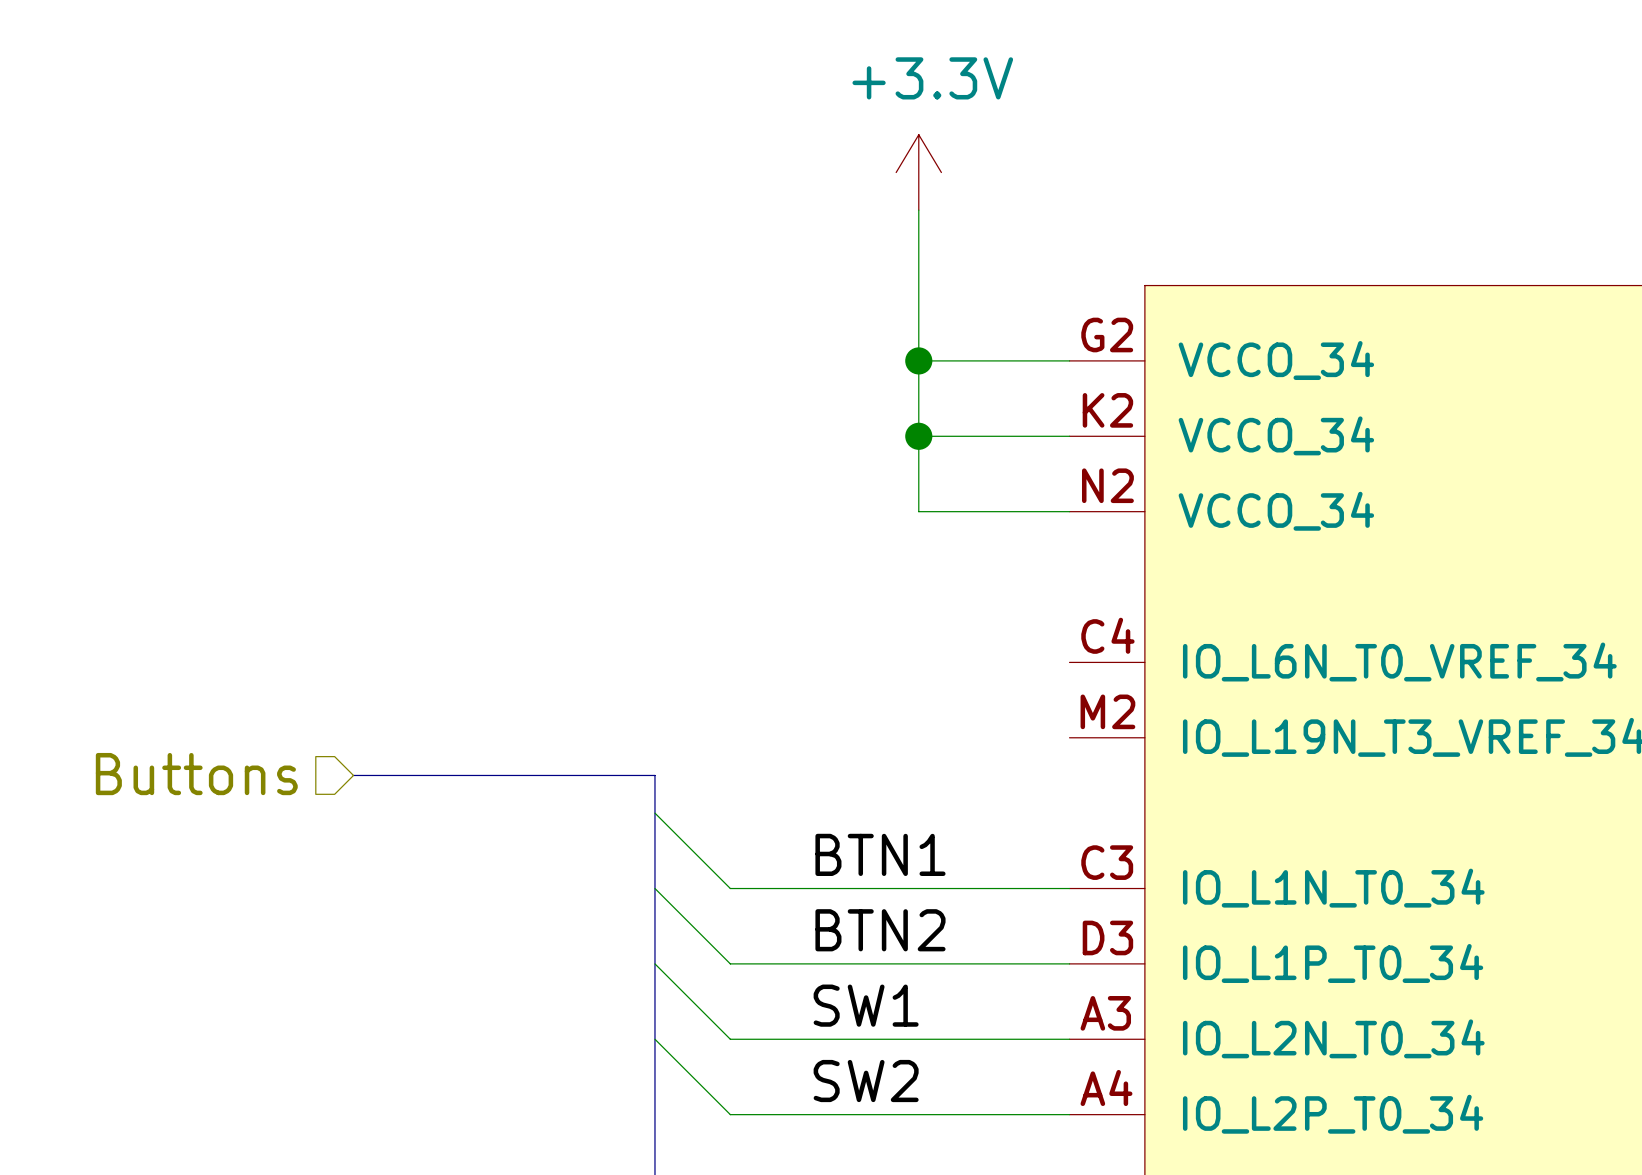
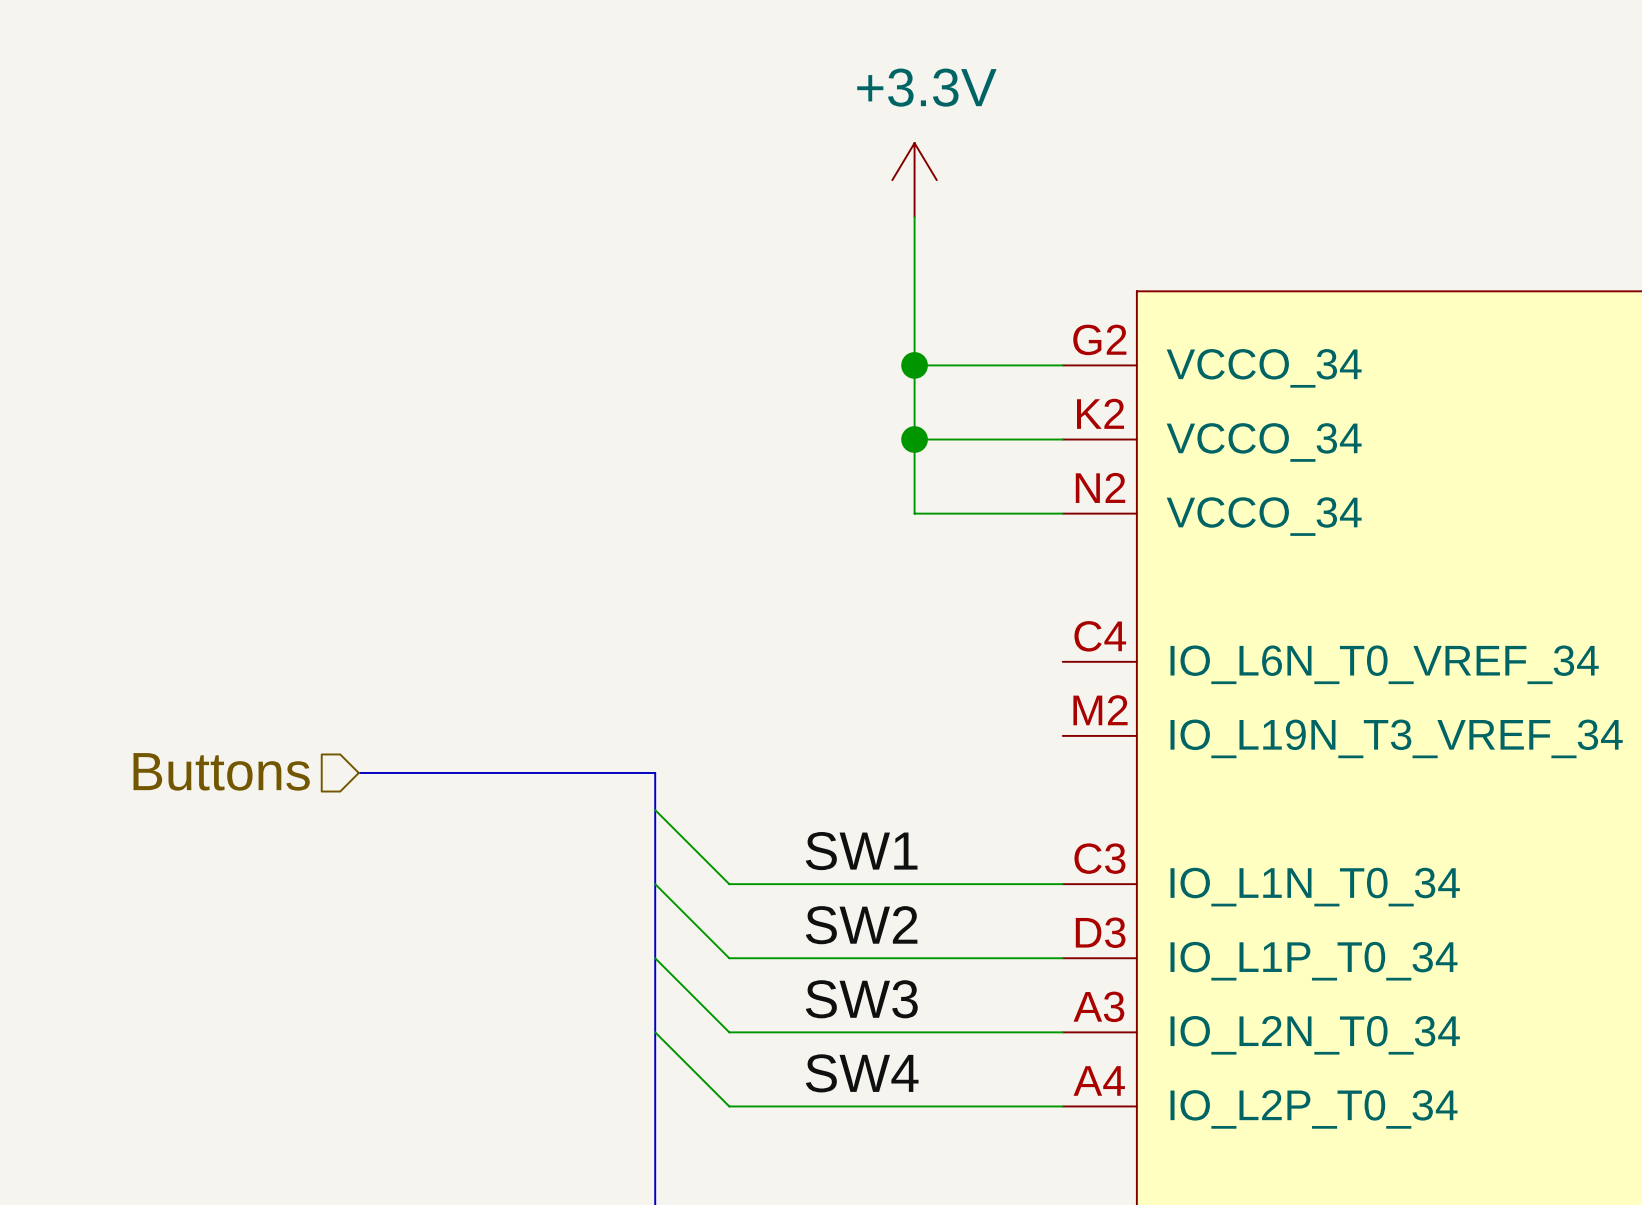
label: BTN1 (880, 854) -> SW1 (861, 851)
label: BTN2 (880, 930) -> SW2 (861, 925)
label: SW1 (866, 1005) -> SW3 (861, 999)
label: SW2 (866, 1081) -> SW4 (862, 1073)

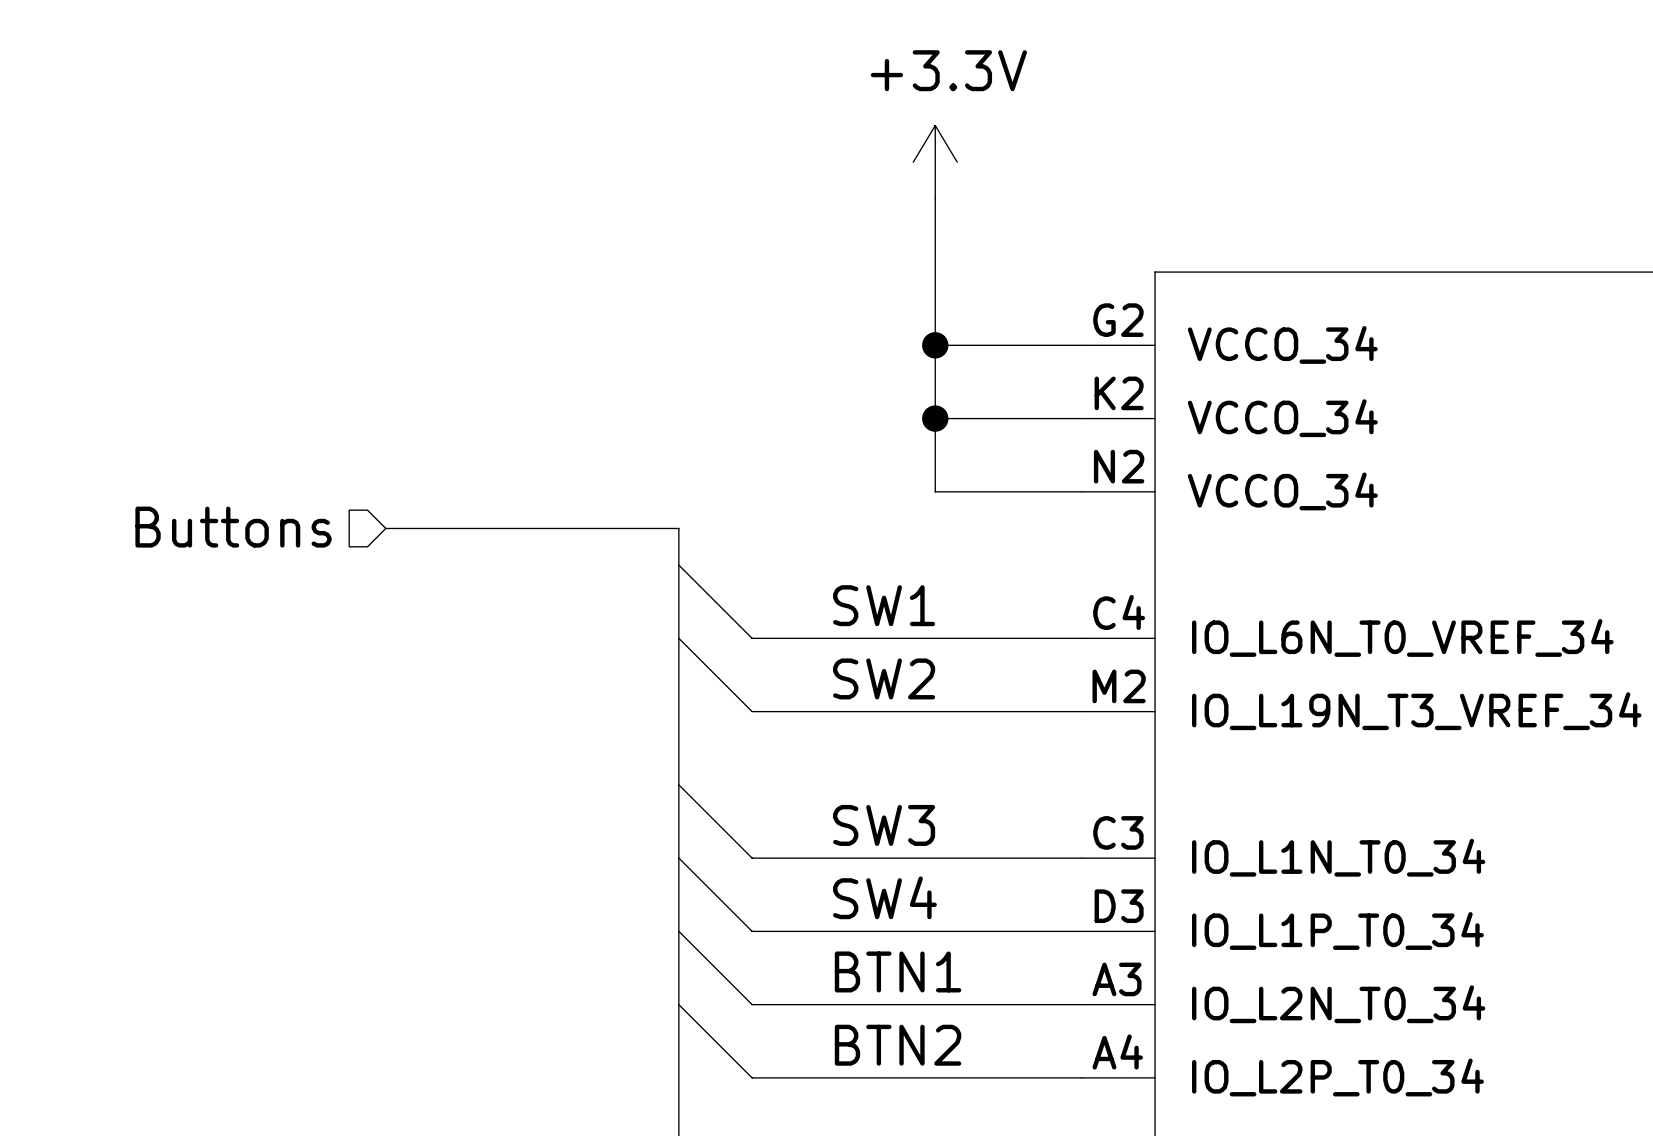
wire: none -> (678, 565) (752, 638) (1081, 638)
label: none -> SW1 (884, 605)
wire: none -> (678, 638) (752, 711) (1081, 711)
label: none -> SW2 (884, 678)
hierarchical label position: Buttons (221, 771) -> Buttons (233, 527)
bus: (358, 772) (655, 772) -> (385, 528) (678, 528) (678, 748)
label: SW1 (861, 851) -> SW3 (884, 825)
label: SW2 (861, 925) -> SW4 (884, 897)
label: SW3 (861, 999) -> BTN1 (898, 971)
label: SW4 (862, 1073) -> BTN2 (898, 1045)

